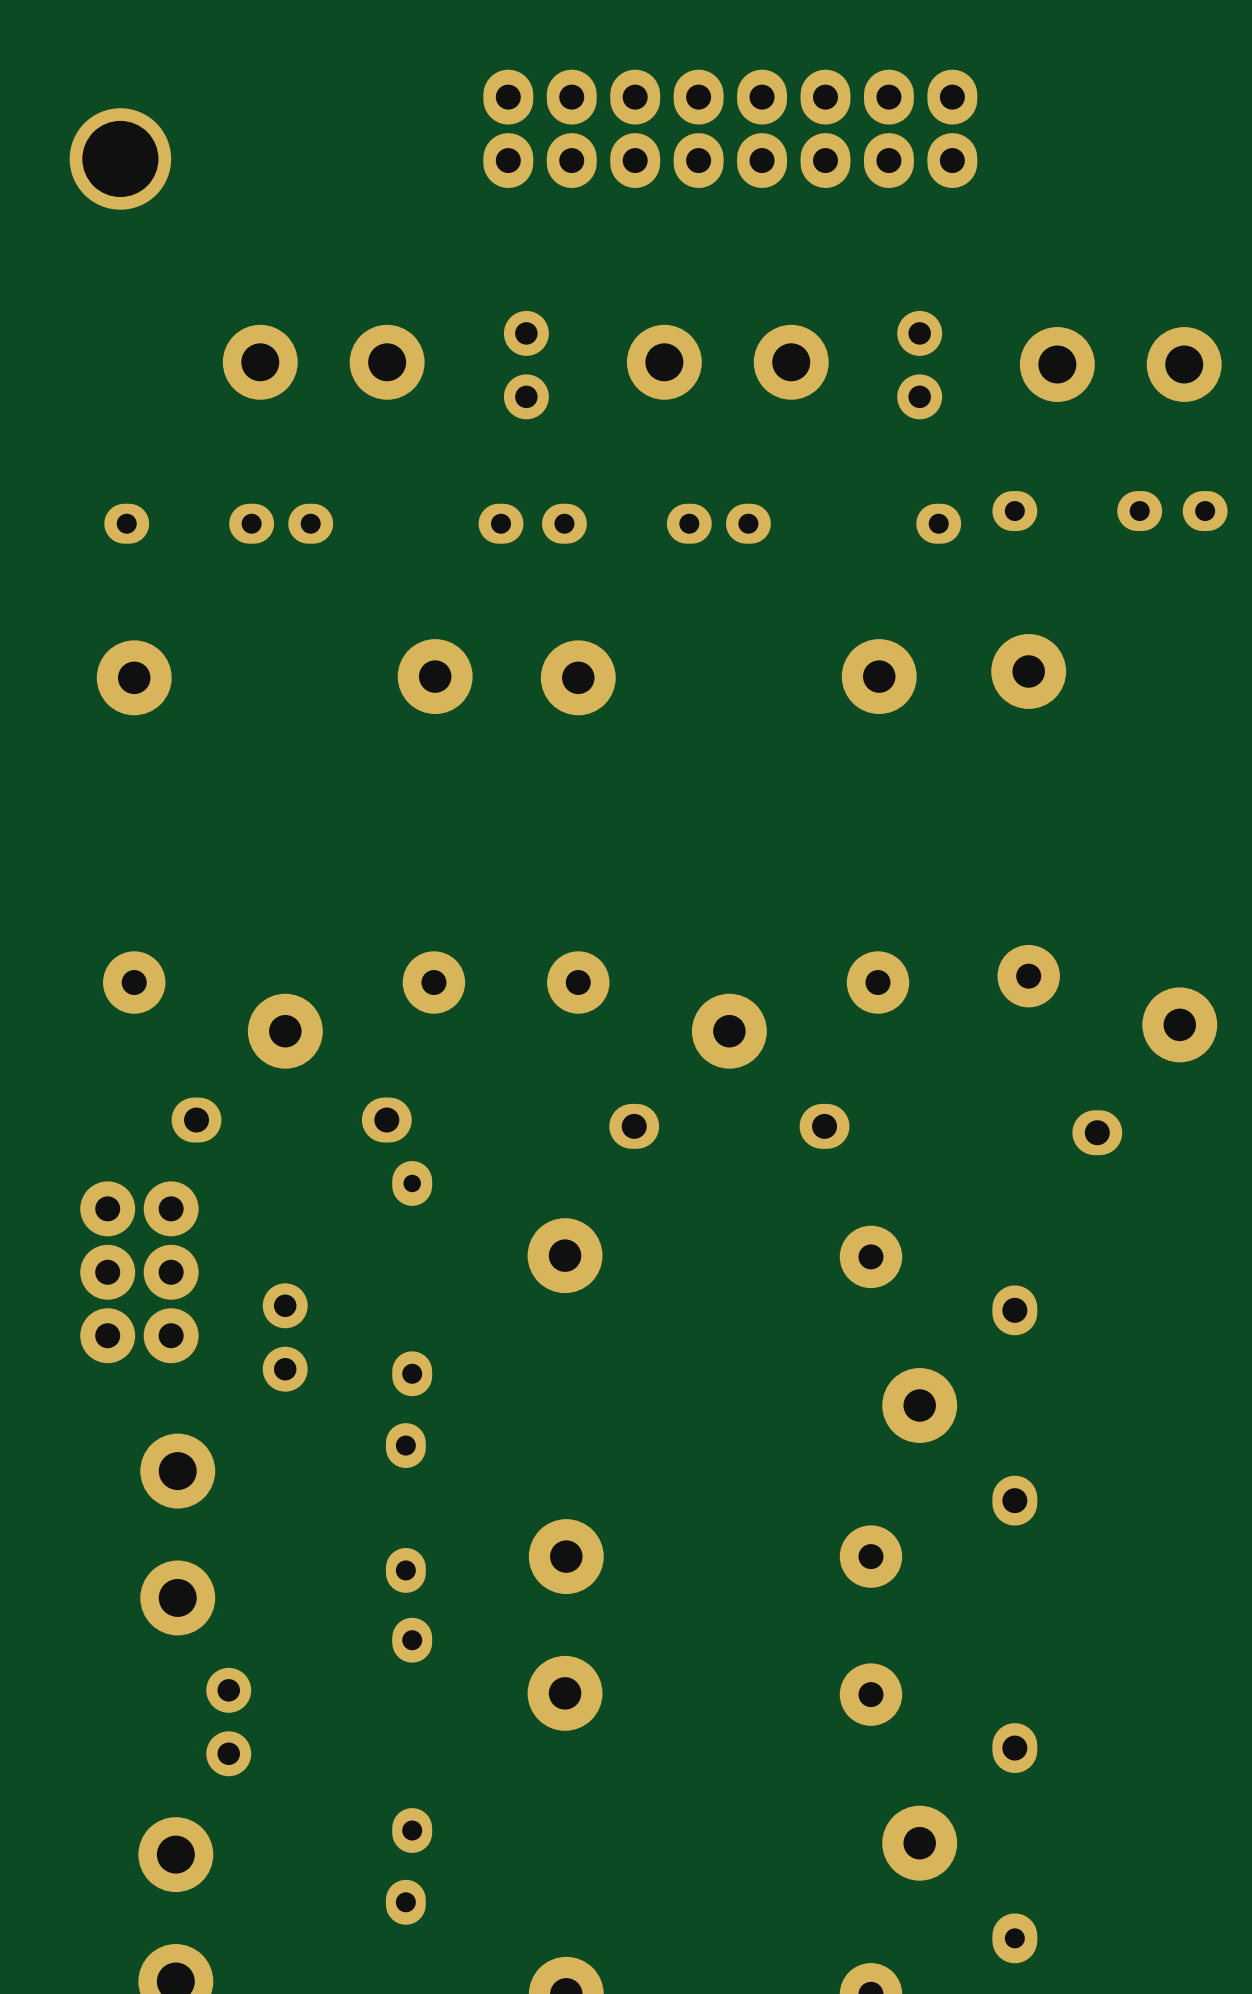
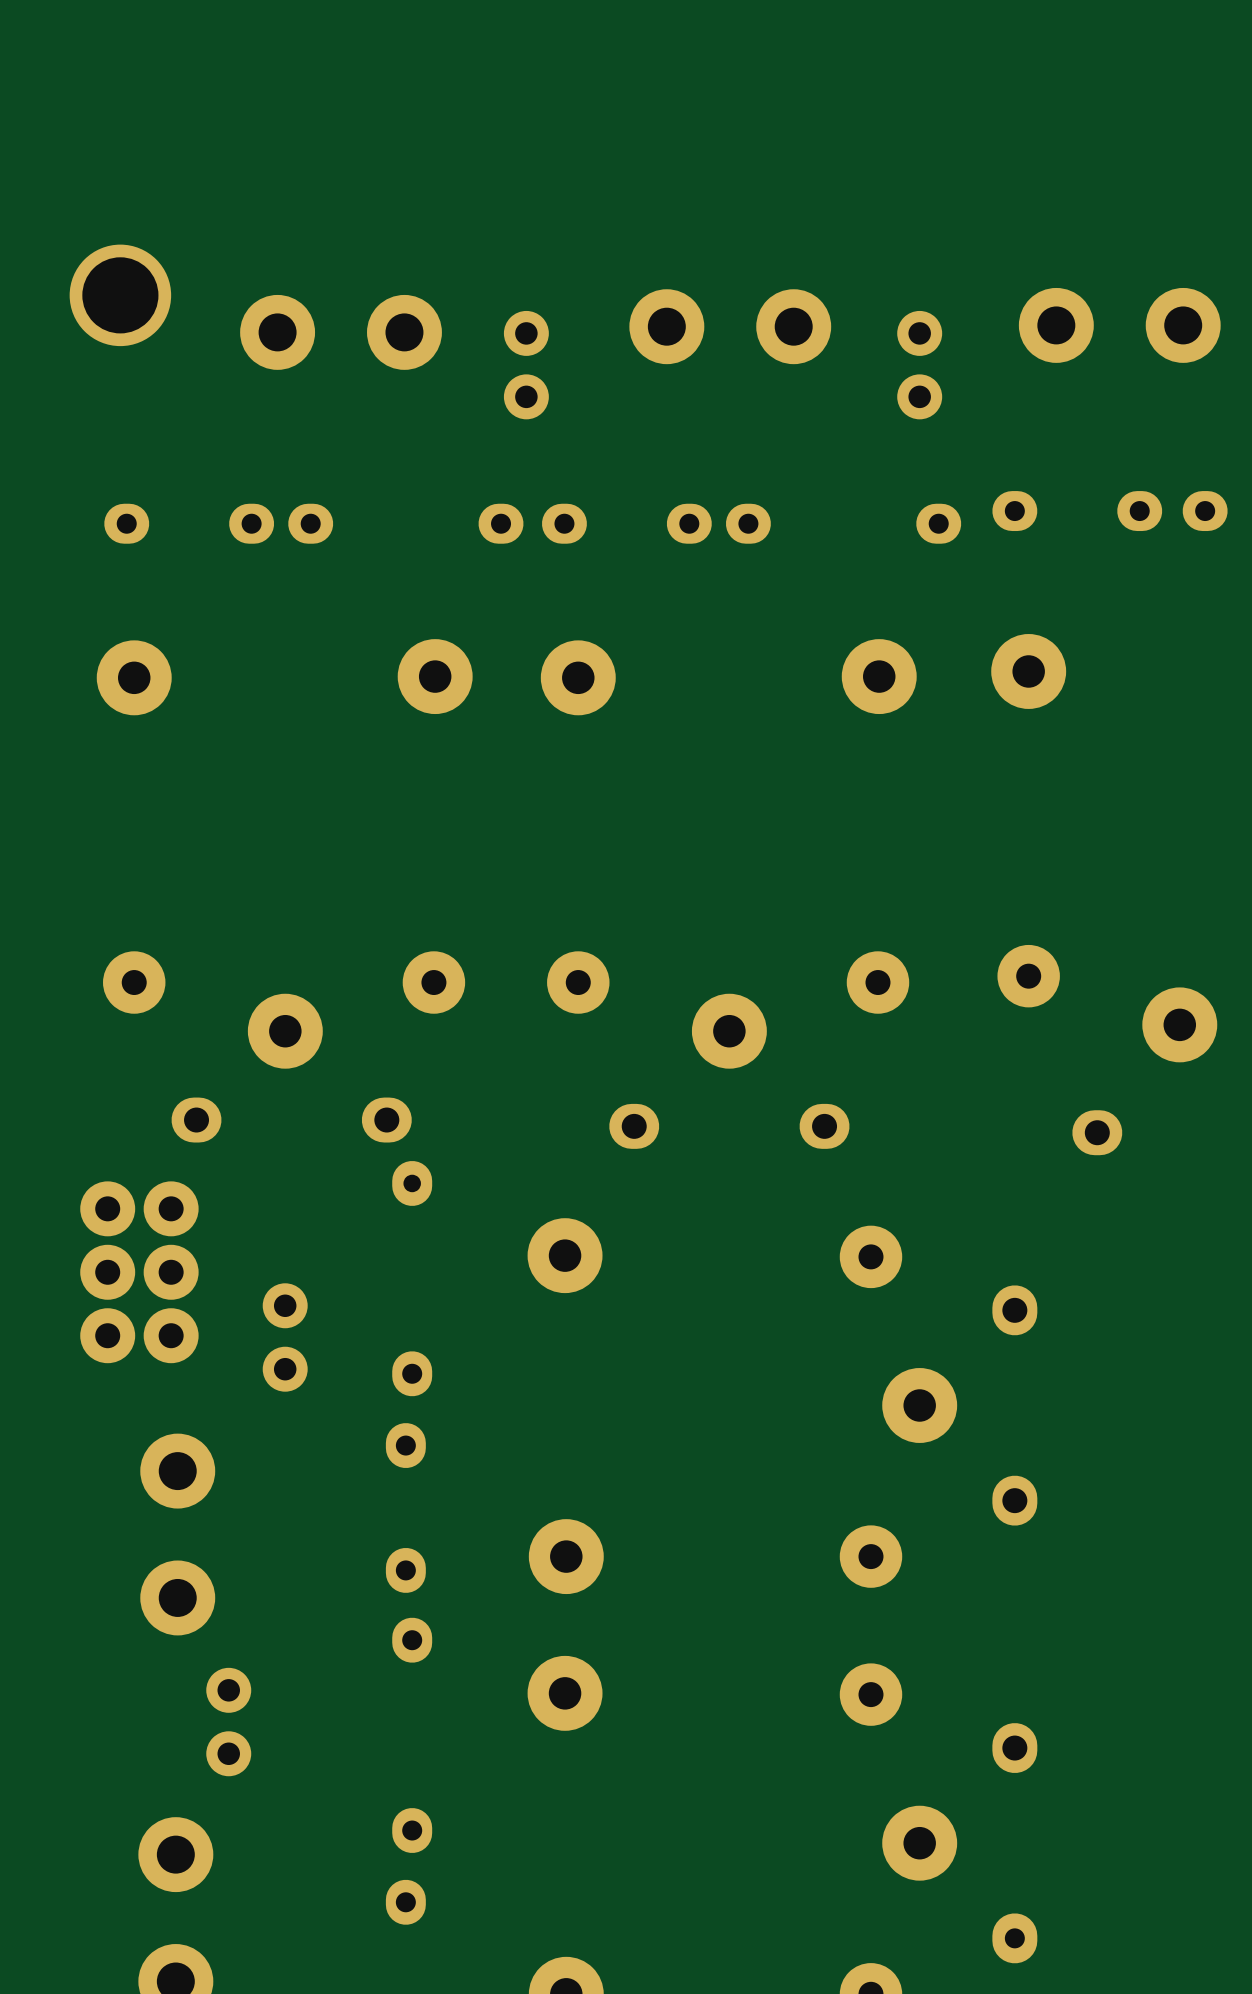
part: (730, 128) -> none
part position: (120, 158) -> (120, 295)
part position: (323, 362) -> (341, 332)
part position: (727, 362) -> (730, 326)
part position: (1120, 364) -> (1119, 325)

